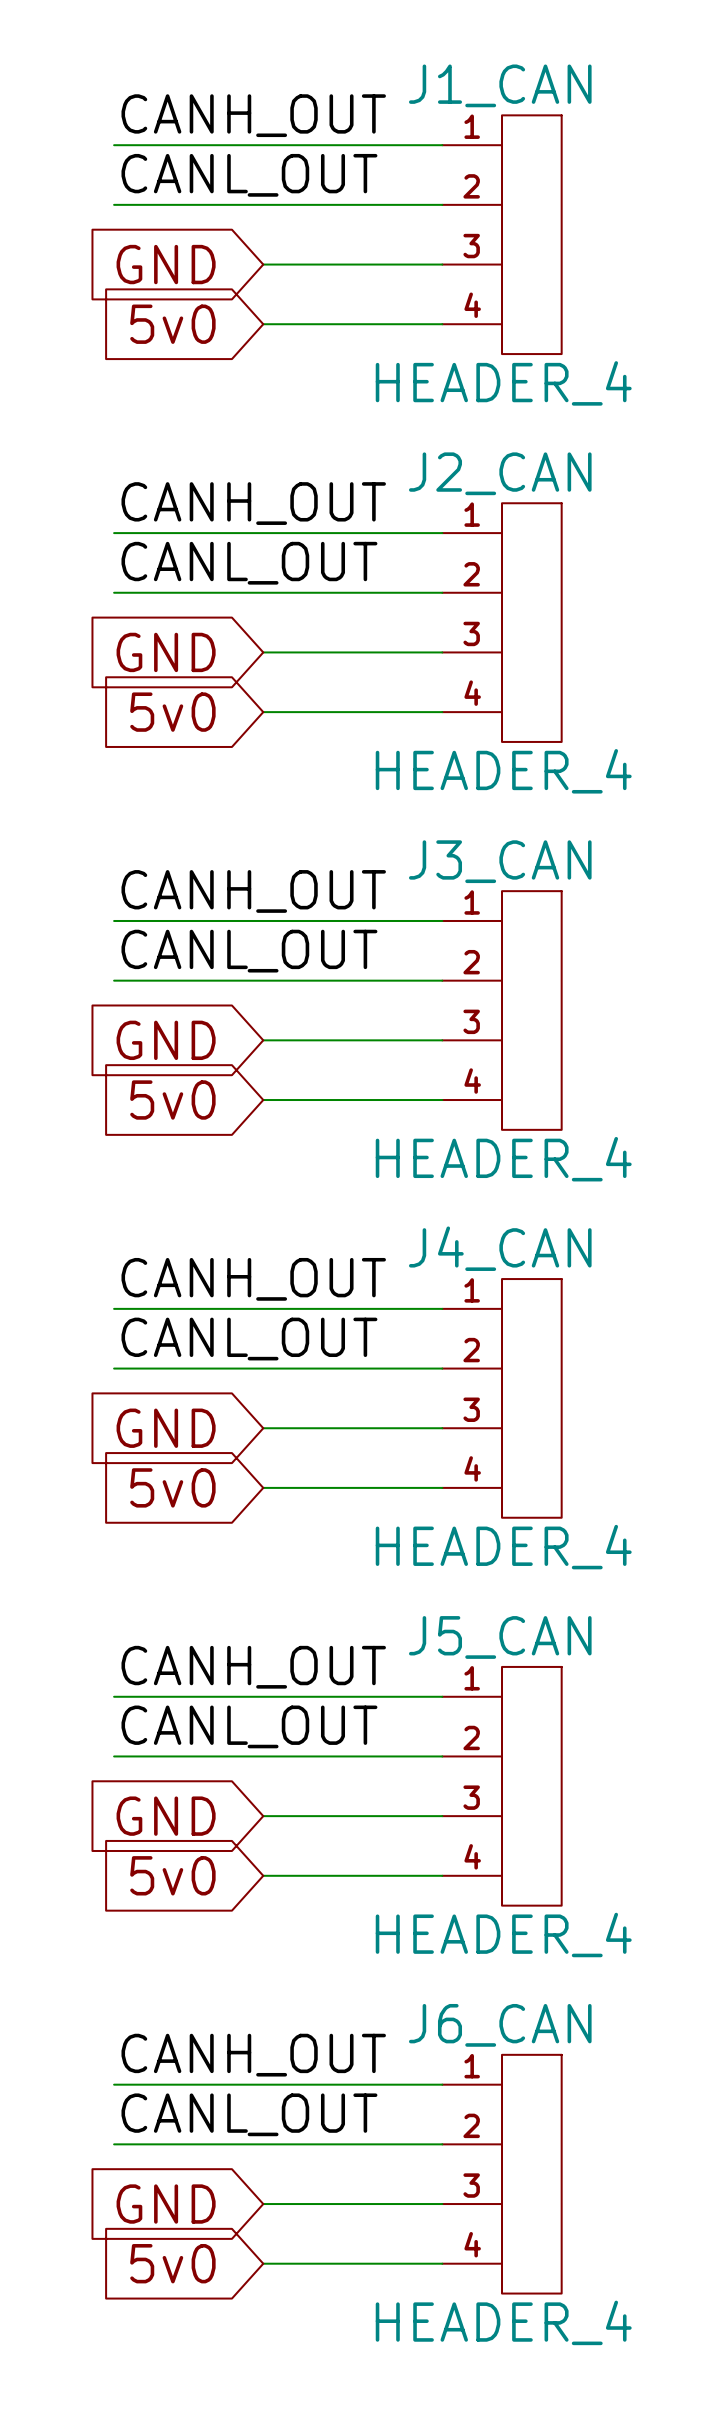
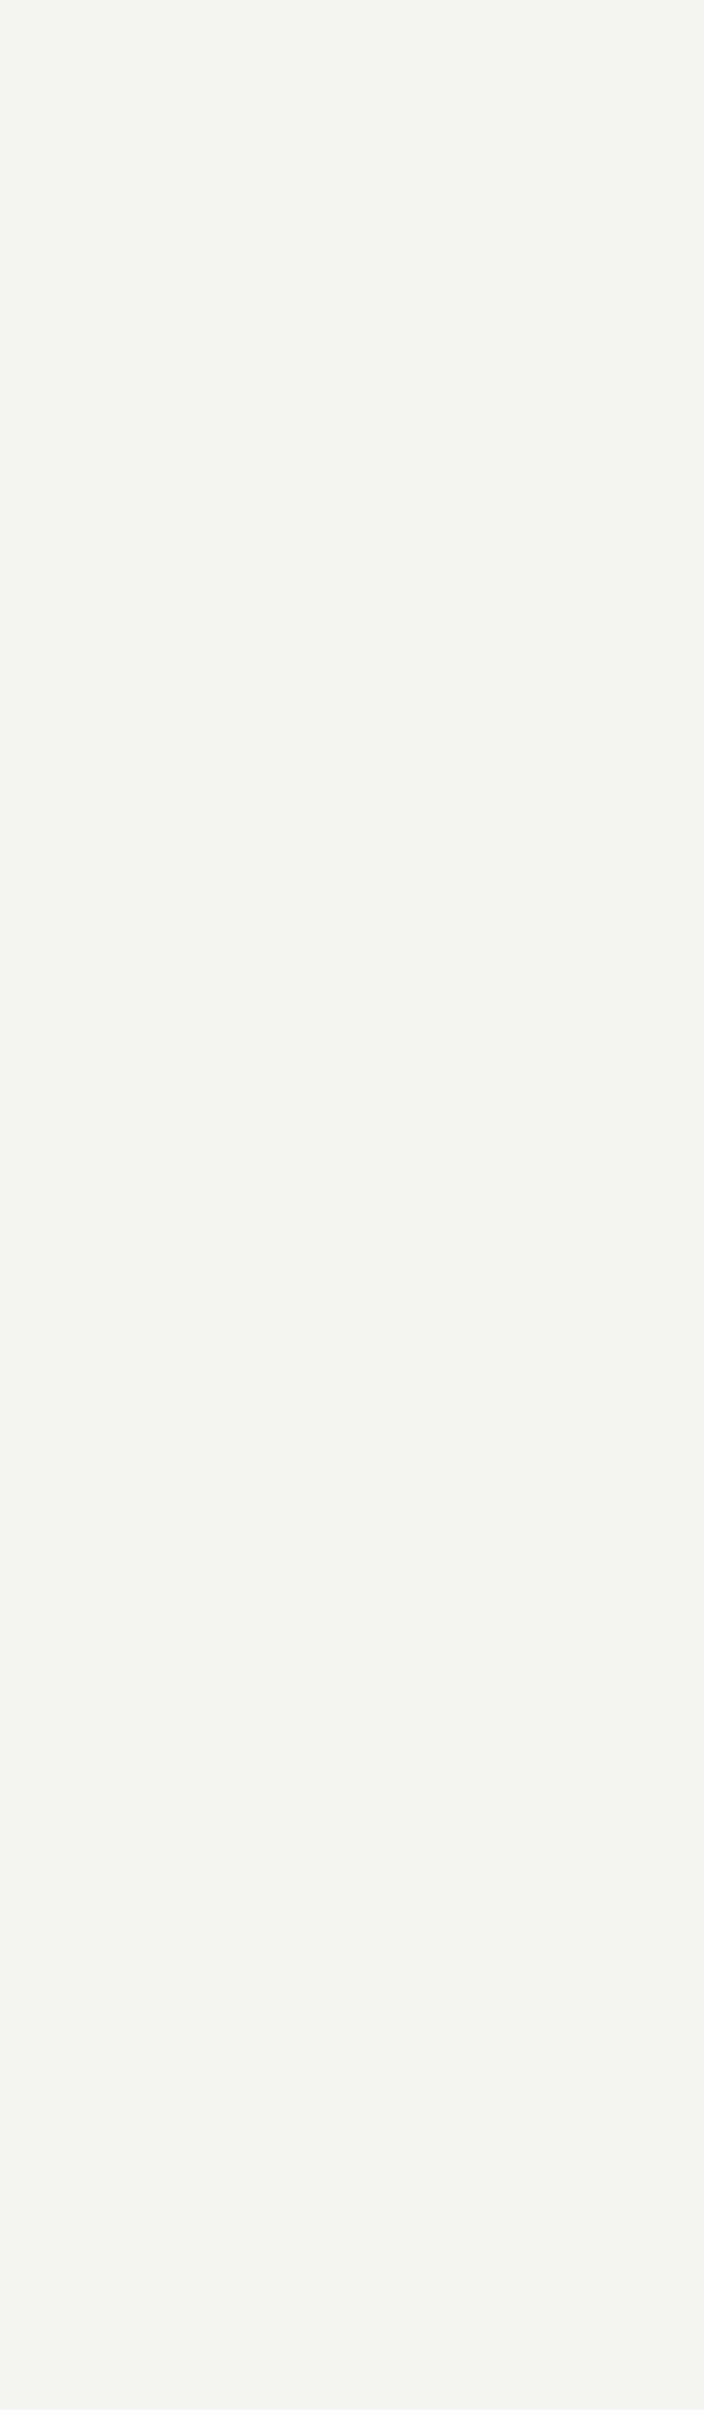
label: CANH_OUT (253, 115) -> none
wire: (114, 145) (442, 145) -> none
label: CANL_OUT (249, 175) -> none
wire: (114, 204) (442, 204) -> none
J1_CAN: HEADER_4 (501, 234) -> none
global label: GND (166, 264) -> none
wire: (263, 264) (442, 264) -> none
global label: 5v0 (172, 324) -> none
wire: (263, 324) (442, 324) -> none
label: CANH_OUT (253, 503) -> none
wire: (114, 533) (442, 533) -> none
label: CANL_OUT (249, 563) -> none
wire: (114, 592) (442, 592) -> none
J2_CAN: HEADER_4 (501, 622) -> none
global label: GND (166, 652) -> none
wire: (263, 652) (442, 652) -> none
global label: 5v0 (172, 712) -> none
wire: (263, 712) (442, 712) -> none
label: CANH_OUT (253, 891) -> none
wire: (114, 920) (442, 920) -> none
label: CANL_OUT (249, 951) -> none
wire: (114, 980) (442, 980) -> none
J3_CAN: HEADER_4 (501, 1010) -> none
global label: GND (166, 1040) -> none
wire: (263, 1040) (442, 1040) -> none
global label: 5v0 (172, 1100) -> none
wire: (263, 1100) (442, 1100) -> none
label: CANH_OUT (253, 1279) -> none
wire: (114, 1308) (442, 1308) -> none
label: CANL_OUT (249, 1339) -> none
wire: (114, 1368) (442, 1368) -> none
J4_CAN: HEADER_4 (501, 1398) -> none
global label: GND (166, 1428) -> none
wire: (263, 1428) (442, 1428) -> none
global label: 5v0 (172, 1487) -> none
wire: (263, 1487) (442, 1487) -> none
label: CANH_OUT (253, 1667) -> none
wire: (114, 1696) (442, 1696) -> none
label: CANL_OUT (249, 1726) -> none
wire: (114, 1756) (442, 1756) -> none
J5_CAN: HEADER_4 (501, 1786) -> none
global label: GND (166, 1816) -> none
wire: (263, 1816) (442, 1816) -> none
global label: 5v0 (172, 1875) -> none
wire: (263, 1875) (442, 1875) -> none
label: CANH_OUT (253, 2055) -> none
wire: (114, 2084) (442, 2084) -> none
label: CANL_OUT (249, 2114) -> none
wire: (114, 2144) (442, 2144) -> none
J6_CAN: HEADER_4 (501, 2174) -> none
global label: GND (166, 2204) -> none
wire: (263, 2204) (442, 2204) -> none
global label: 5v0 (172, 2263) -> none
wire: (263, 2263) (442, 2263) -> none

